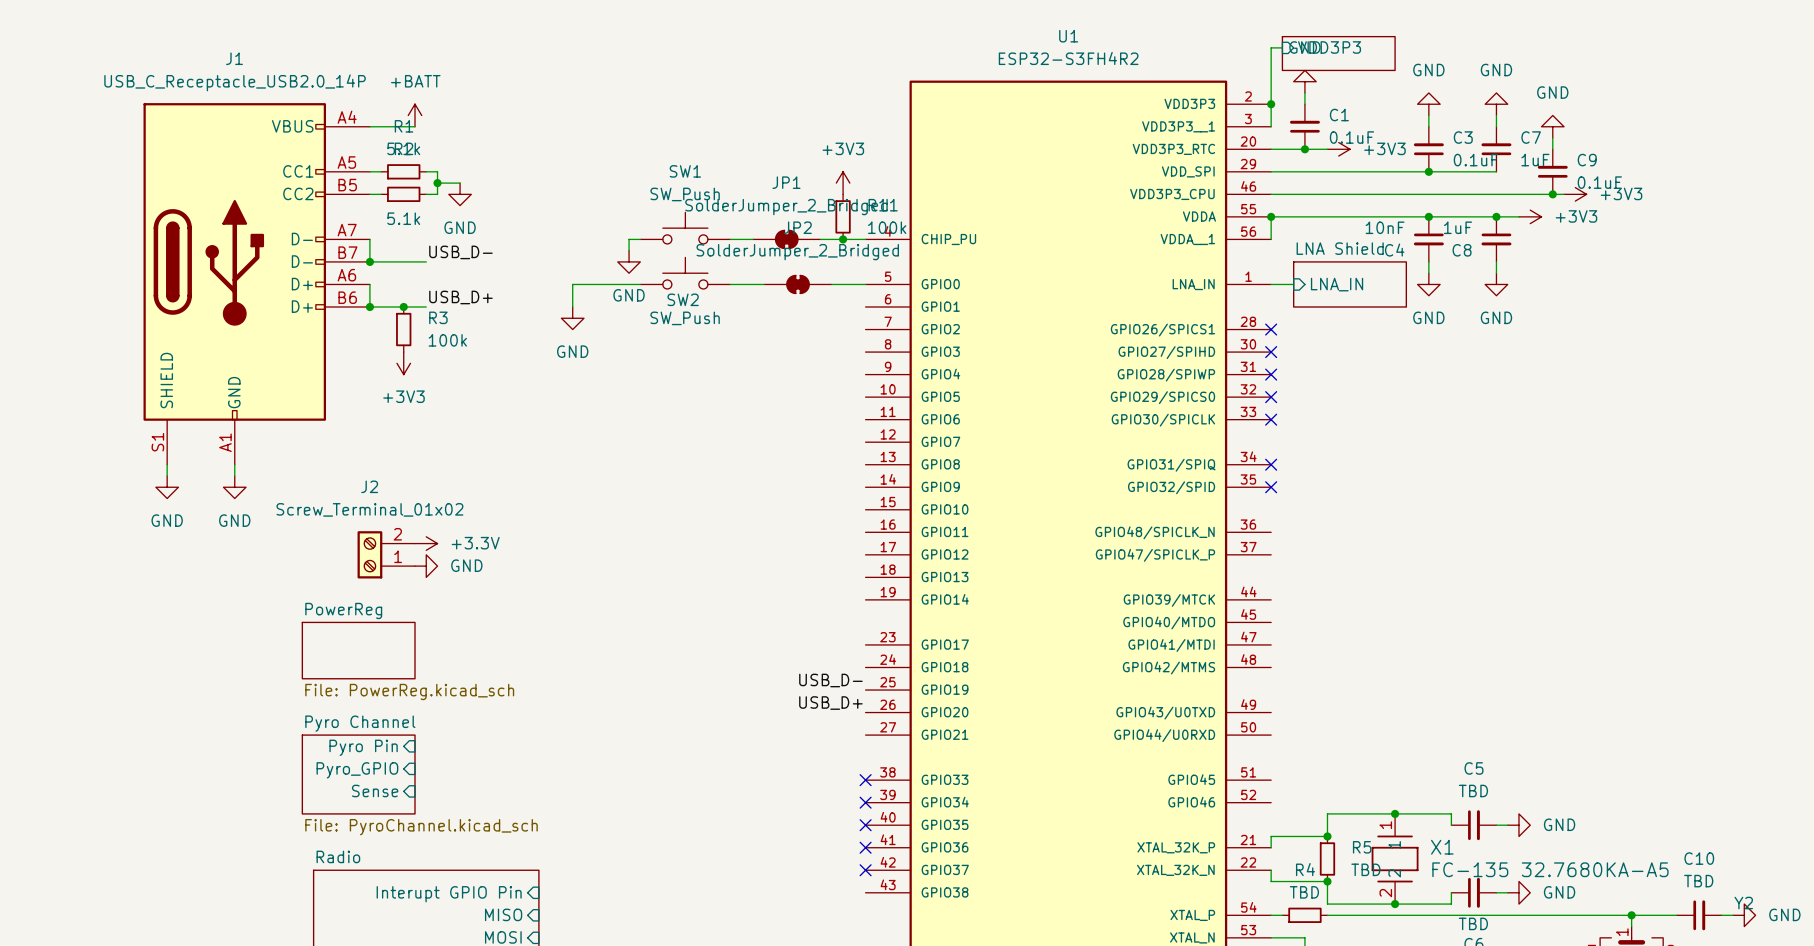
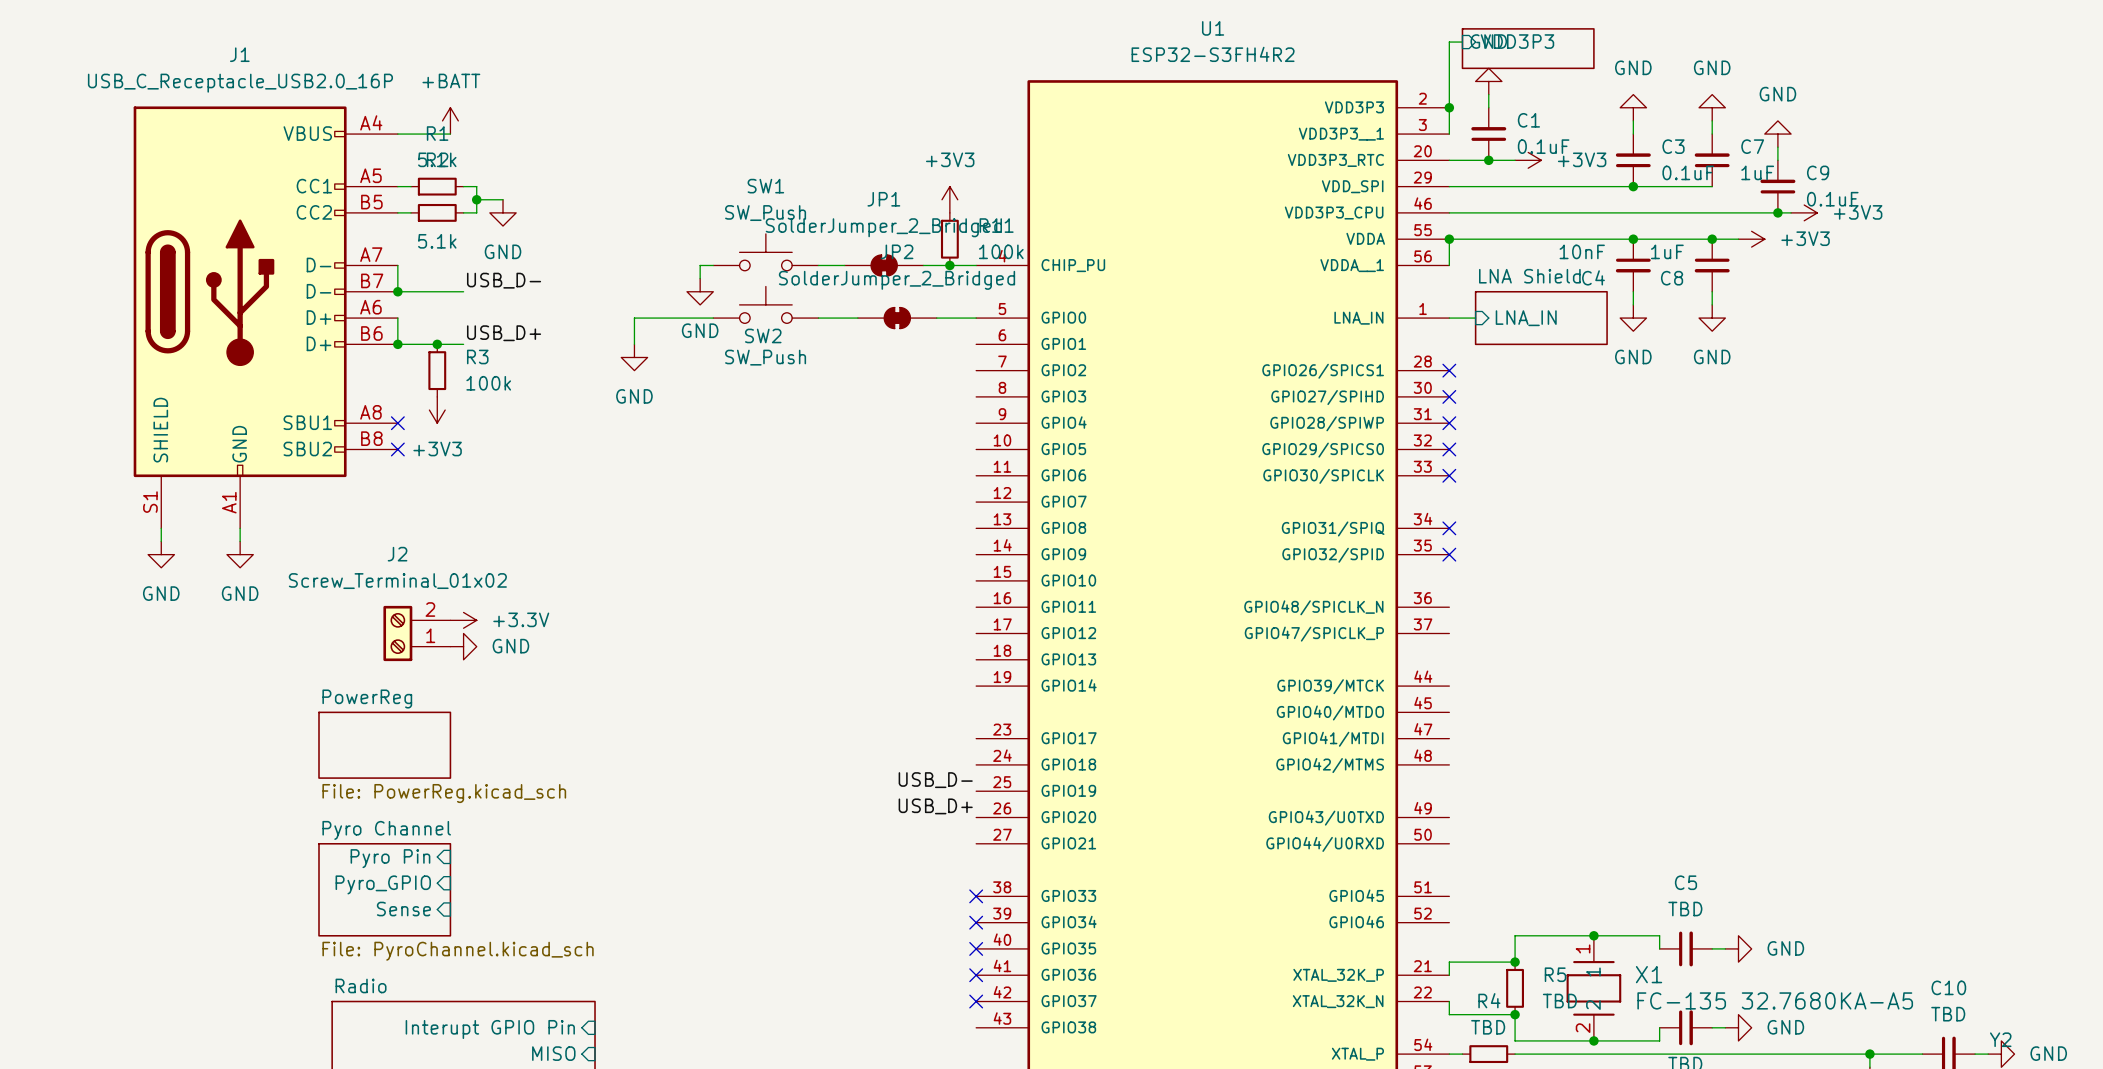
J1 value: USB_C_Receptacle_USB2.0_14P (235, 82) -> USB_C_Receptacle_USB2.0_16P (240, 83)
J1 symbol: [143, 103, 370, 465] -> [133, 106, 398, 529]
no-connect mark: none -> (397, 423)
no-connect mark: none -> (397, 449)

